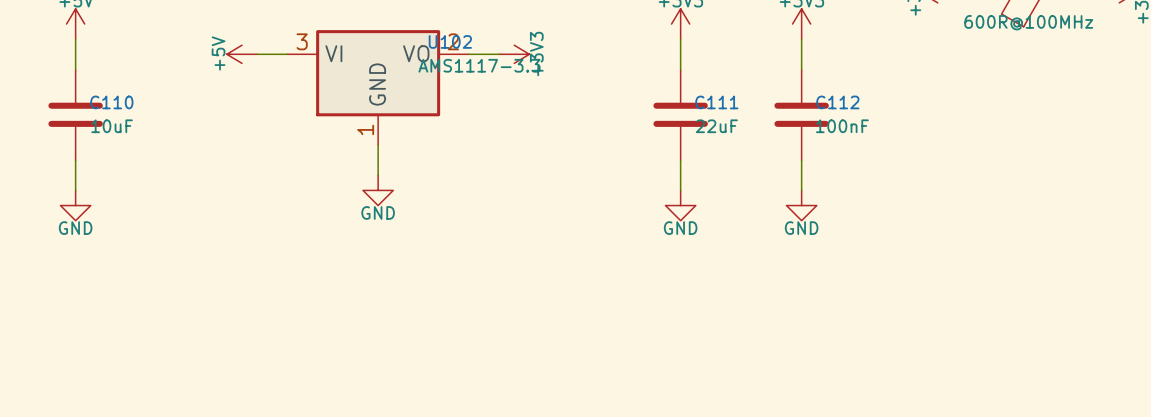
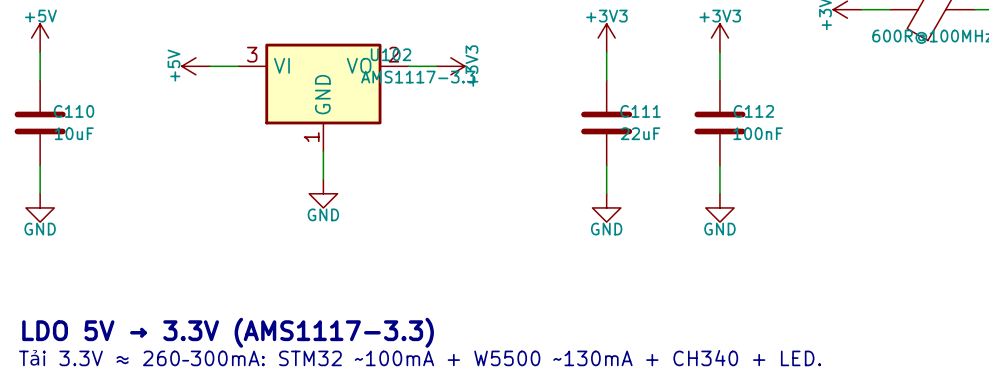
text: none -> LDO 5V → 3.3V (AMS1117-3.3) (228, 332)
text: none -> Tải 3.3V ≈ 260–300mA: STM32 ~100mA + W5500 ~130mA + CH340 + LED. (420, 357)

